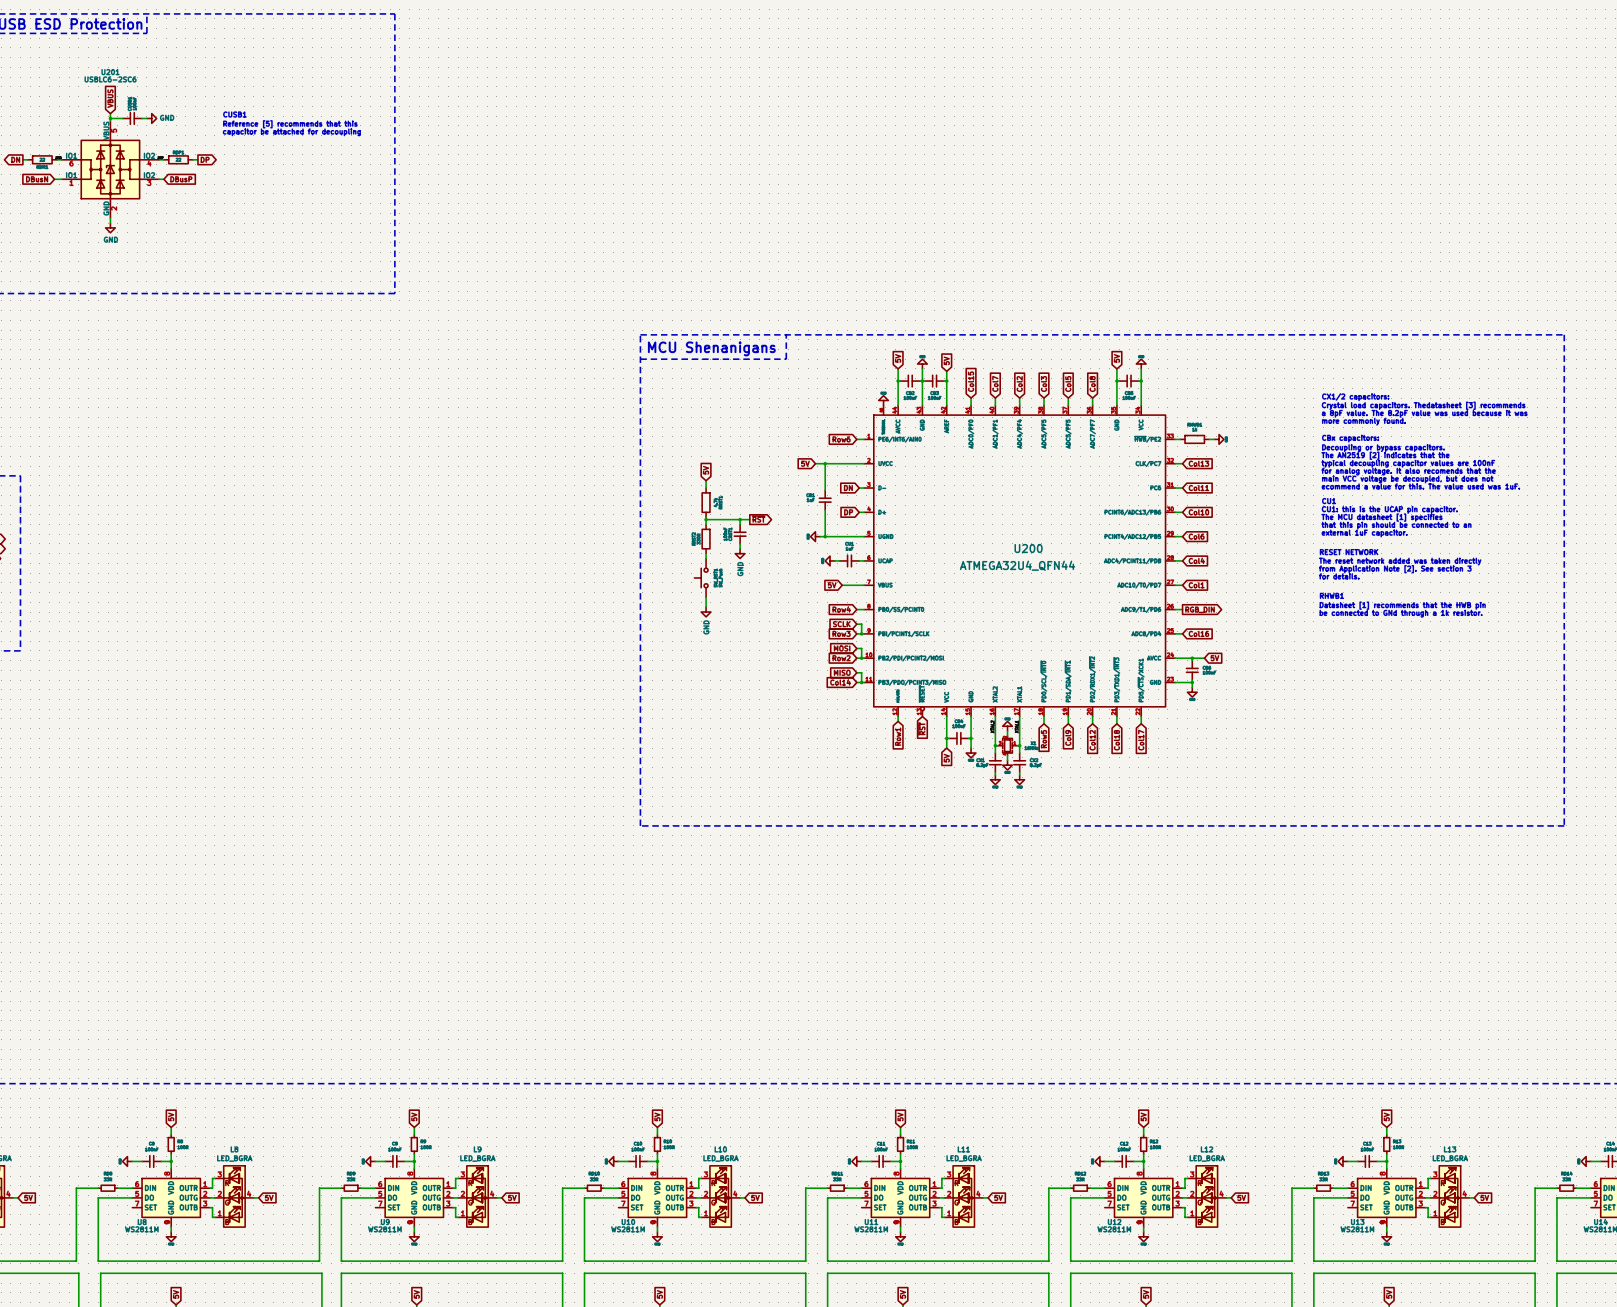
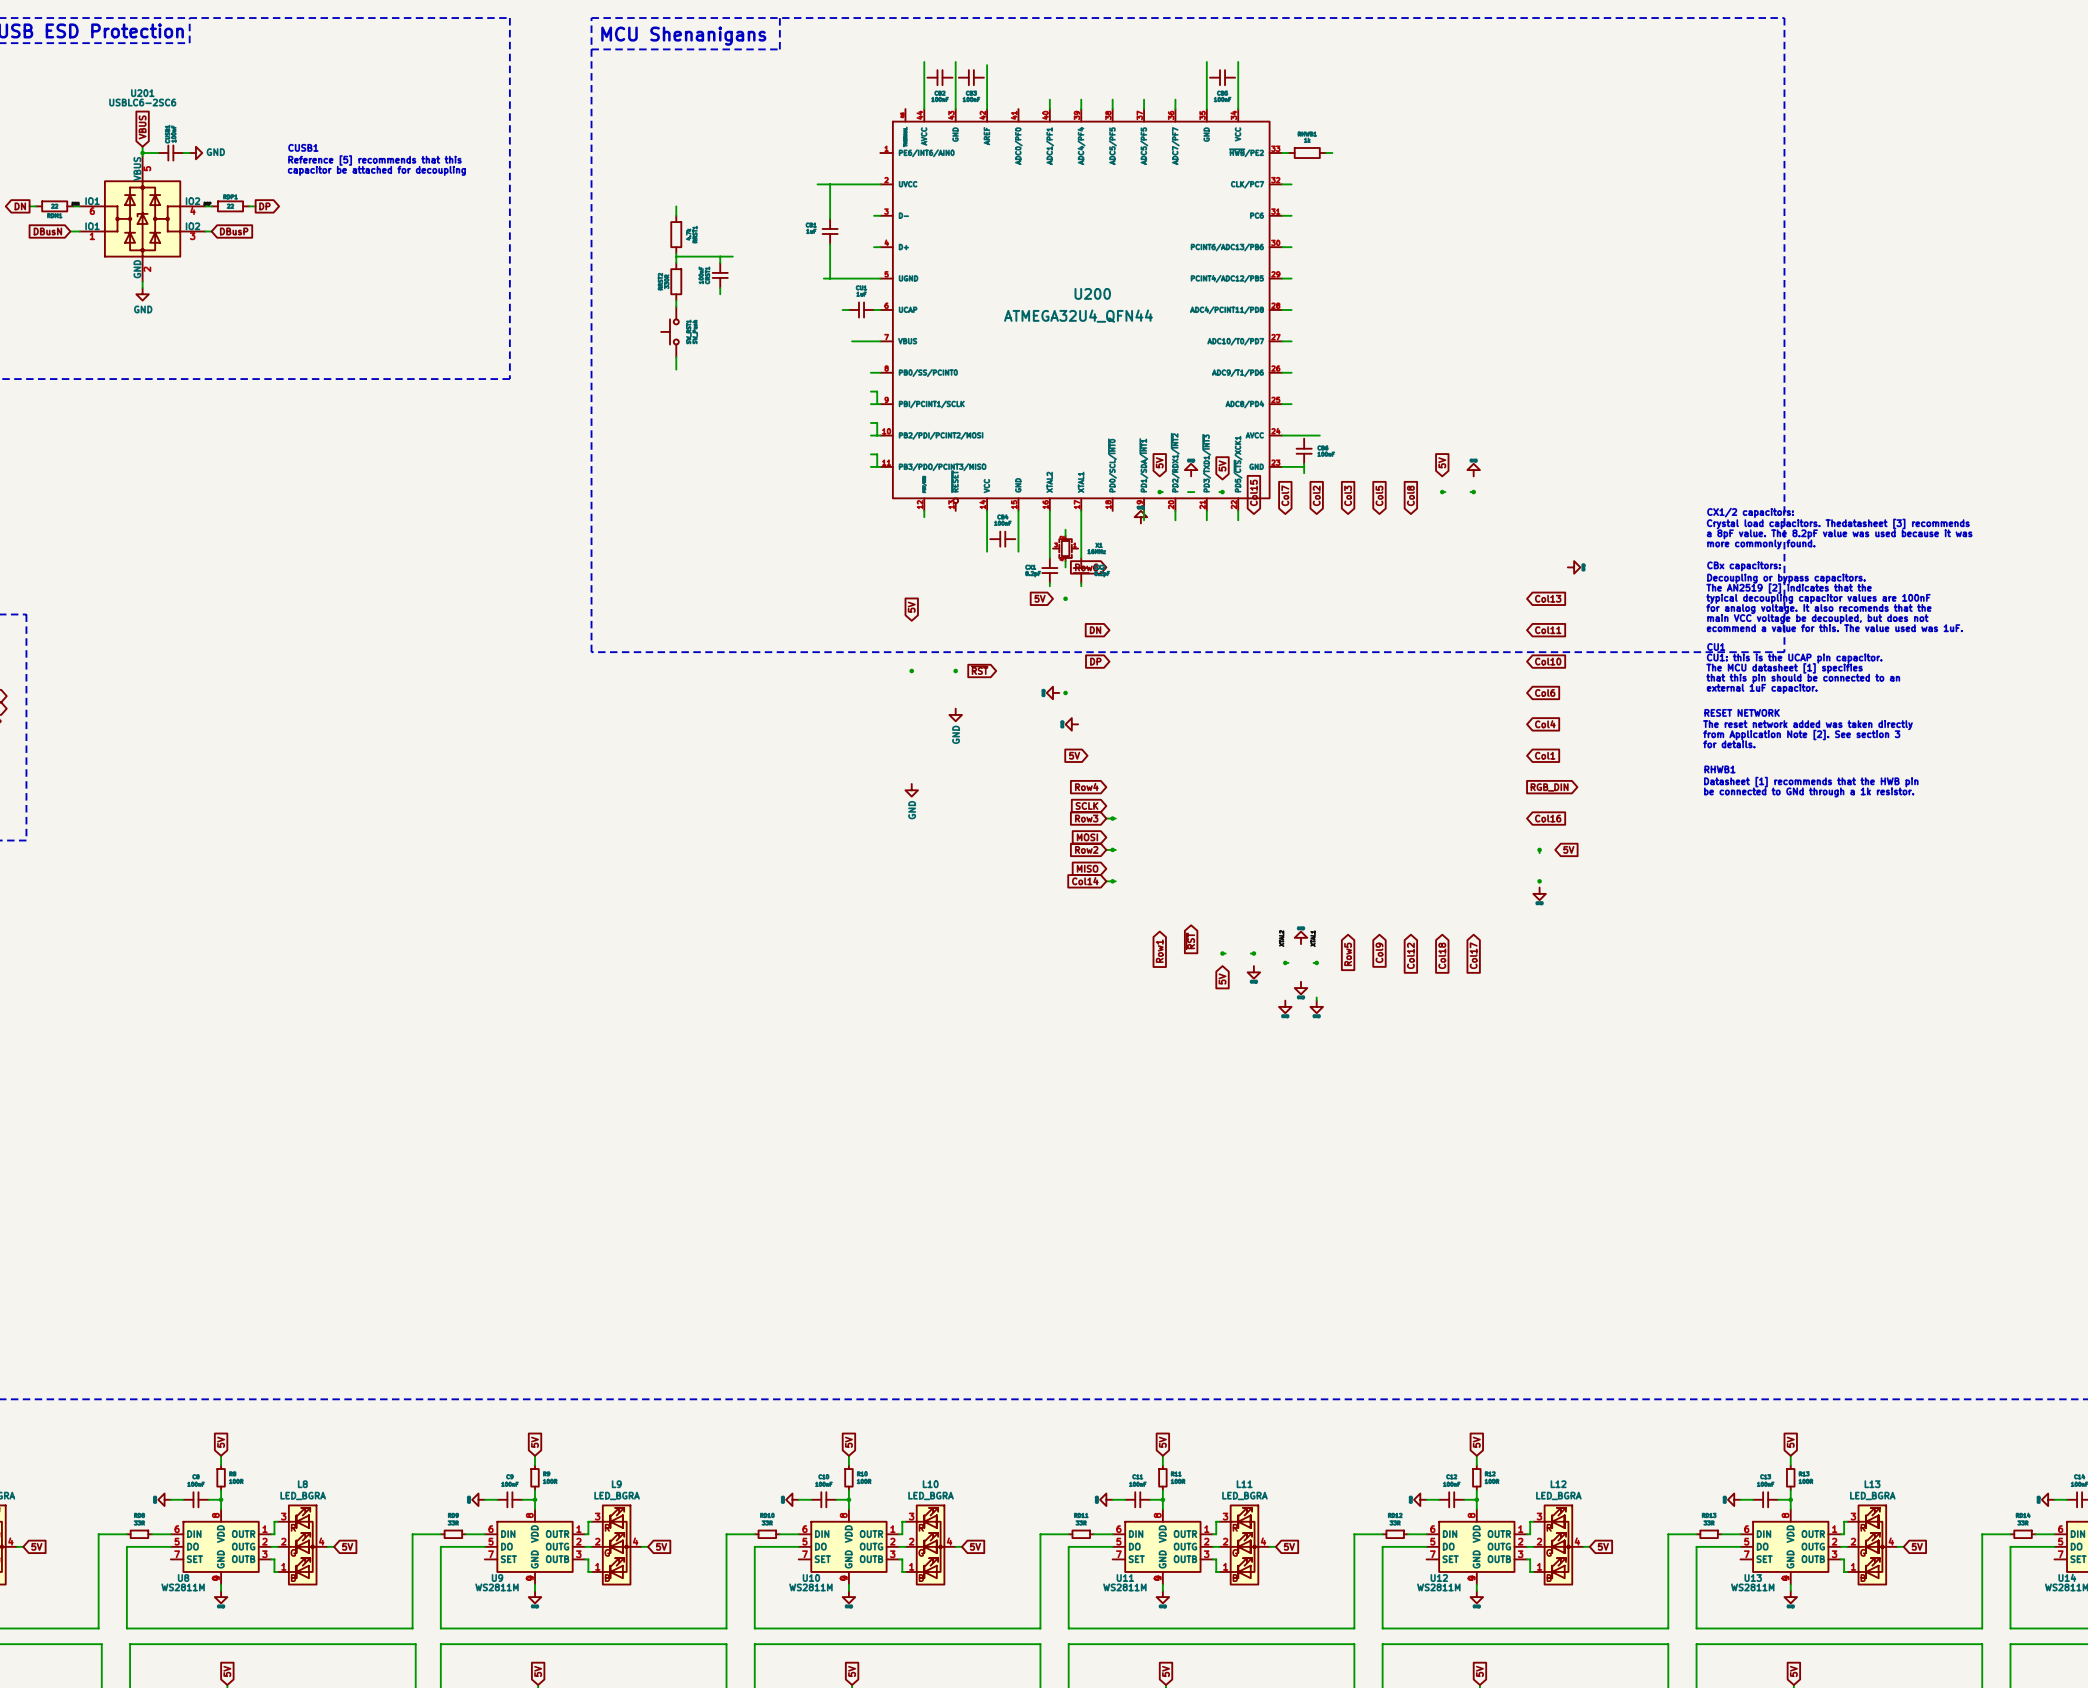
line: none -> (591, 18) (1784, 18) (1784, 652) (591, 652) (591, 18)
line: none -> (779, 18) (779, 49) (591, 49)
text: none -> MCU Shenanigans (683, 36)
wire: none -> (924, 61) (924, 109)
wire: none -> (955, 61) (955, 109)
wire: none -> (1206, 61) (1206, 109)
wire: none -> (1238, 61) (1238, 109)
wire: none -> (987, 65) (987, 109)
wire: none -> (1049, 99) (1049, 109)
wire: none -> (1081, 99) (1081, 109)
wire: none -> (1112, 99) (1112, 109)
wire: none -> (1144, 99) (1144, 109)
wire: none -> (1175, 99) (1175, 109)
wire: none -> (1282, 153) (1288, 153)
wire: none -> (1326, 153) (1332, 153)
wire: none -> (817, 184) (880, 184)
wire: none -> (830, 184) (830, 218)
wire: none -> (1282, 184) (1291, 184)
wire: none -> (676, 206) (676, 215)
wire: none -> (874, 215) (880, 215)
wire: none -> (1282, 215) (1291, 215)
wire: none -> (830, 244) (830, 278)
wire: none -> (874, 247) (880, 247)
wire: none -> (1282, 247) (1291, 247)
wire: none -> (676, 253) (676, 262)
wire: none -> (676, 256) (732, 256)
wire: none -> (720, 256) (720, 262)
wire: none -> (823, 278) (880, 278)
wire: none -> (1282, 278) (1291, 278)
wire: none -> (720, 288) (720, 294)
wire: none -> (676, 300) (676, 306)
wire: none -> (842, 309) (848, 309)
wire: none -> (874, 309) (880, 309)
wire: none -> (1282, 309) (1291, 309)
wire: none -> (852, 341) (880, 341)
wire: none -> (1282, 341) (1291, 341)
wire: none -> (676, 357) (676, 369)
wire: none -> (870, 372) (880, 372)
wire: none -> (1282, 372) (1291, 372)
wire: none -> (870, 391) (877, 391) (877, 404)
wire: none -> (870, 404) (880, 404)
wire: none -> (1282, 404) (1291, 404)
wire: none -> (870, 422) (877, 422) (877, 435)
line: (640, 334) (1564, 334) (1564, 825) (640, 825) (640, 334) -> none
line: (786, 334) (786, 359) (640, 359) -> none
wire: none -> (870, 435) (880, 435)
wire: none -> (1282, 435) (1319, 435)
text: MCU Shenanigans (711, 348) -> none
wire: none -> (870, 454) (877, 454) (877, 466)
wire: none -> (870, 466) (880, 466)
wire: none -> (1282, 466) (1304, 466)
wire: (898, 368) (898, 405) -> (1049, 510) (1049, 557)
wire: (922, 368) (922, 405) -> (1081, 510) (1081, 557)
wire: (1116, 368) (1116, 405) -> none
wire: (1141, 368) (1141, 405) -> none
wire: (946, 371) (946, 405) -> none
part position: (910, 381) -> (939, 77)
part position: (934, 381) -> (971, 77)
part position: (1129, 381) -> (1222, 77)
wire: none -> (924, 510) (924, 517)
wire: none -> (987, 510) (987, 551)
wire: none -> (1018, 510) (1018, 551)
wire: (971, 398) (971, 405) -> (1144, 510) (1144, 520)
wire: (995, 398) (995, 405) -> (1175, 510) (1175, 520)
wire: (1019, 398) (1019, 405) -> (1206, 510) (1206, 520)
wire: (1043, 398) (1043, 405) -> (1238, 510) (1238, 520)
wire: (1068, 398) (1068, 405) -> (1304, 463) (1304, 473)
wire: (1092, 398) (1092, 405) -> none
wire: none -> (1065, 529) (1065, 536)
wire: none -> (1065, 561) (1065, 567)
wire: (856, 439) (864, 439) -> none
wire: (1175, 439) (1180, 439) -> none
part position: (1194, 439) -> (1307, 153)
wire: (1209, 439) (1214, 439) -> none
wire: none -> (1049, 583) (1049, 586)
wire: none -> (1081, 583) (1081, 586)
wire: (815, 463) (864, 463) -> none
wire: (825, 463) (825, 490) -> none
wire: (1175, 463) (1182, 463) -> none
wire: (706, 480) (706, 488) -> none
wire: (859, 488) (864, 488) -> none
wire: (1175, 488) (1182, 488) -> none
part position: (825, 500) -> (830, 231)
part position: (706, 502) -> (676, 234)
wire: (825, 509) (825, 536) -> none
wire: (859, 512) (864, 512) -> none
wire: (1175, 512) (1182, 512) -> none
wire: (706, 517) (706, 524) -> none
wire: (706, 519) (749, 519) -> none
wire: (740, 519) (740, 524) -> none
part position: (740, 534) -> (720, 275)
wire: (820, 536) (864, 536) -> none
wire: (1175, 536) (1182, 536) -> none
part position: (706, 539) -> (676, 281)
wire: (740, 543) (740, 548) -> none
wire: (706, 553) (706, 558) -> none
wire: (834, 560) (839, 560) -> none
part position: (849, 560) -> (861, 309)
wire: (859, 560) (864, 560) -> none
U200 position: (1019, 560) -> (1081, 309)
wire: (1175, 560) (1182, 560) -> none
part position: (701, 577) -> (670, 331)
wire: (842, 585) (864, 585) -> none
wire: (1175, 585) (1182, 585) -> none
wire: (706, 597) (706, 607) -> none
wire: (856, 609) (864, 609) -> none
wire: (1175, 609) (1182, 609) -> none
wire: (856, 624) (861, 624) (861, 633) -> none
wire: (1175, 633) (1182, 633) -> none
wire: (856, 648) (861, 648) (861, 658) -> none
wire: (1175, 658) (1204, 658) -> none
part position: (1192, 670) -> (1304, 451)
wire: (856, 672) (861, 672) (861, 682) -> none
wire: (1192, 680) (1192, 687) -> none
wire: (1175, 682) (1192, 682) -> none
wire: (898, 716) (898, 721) -> none
wire: (946, 716) (946, 748) -> none
wire: (971, 716) (971, 748) -> none
wire: (995, 716) (995, 753) -> none
wire: (1019, 716) (1019, 753) -> none
wire: (1043, 716) (1043, 723) -> none
wire: (1068, 716) (1068, 723) -> none
wire: (1092, 716) (1092, 723) -> none
wire: (1116, 716) (1116, 723) -> none
wire: (1141, 716) (1141, 723) -> none
wire: (1007, 731) (1007, 736) -> none
part position: (958, 738) -> (1002, 539)
part position: (1007, 745) -> (1065, 548)
wire: (1007, 755) (1007, 760) -> none
part position: (995, 762) -> (1049, 570)
part position: (1019, 762) -> (1081, 570)
wire: (995, 772) (995, 774) -> none

